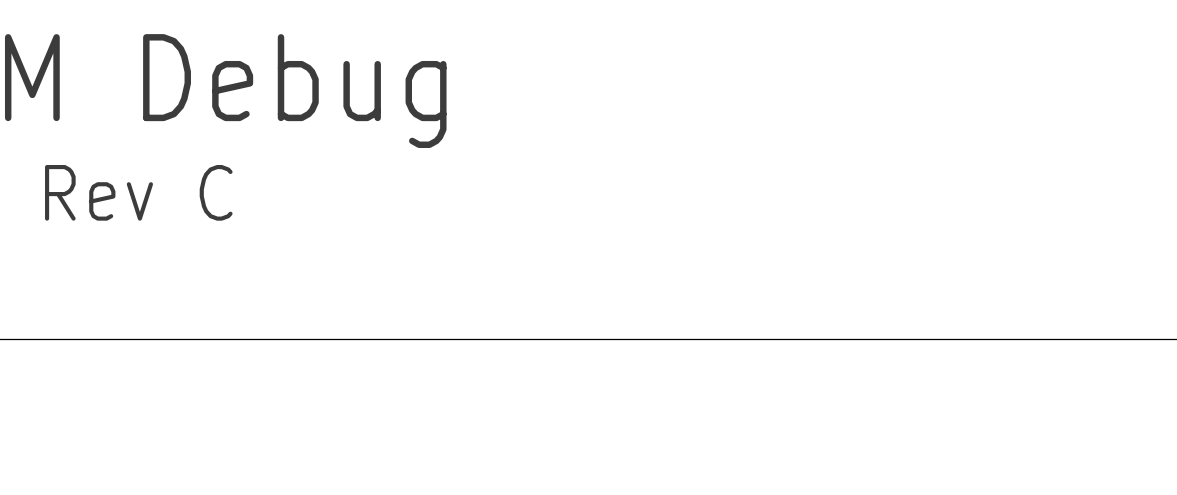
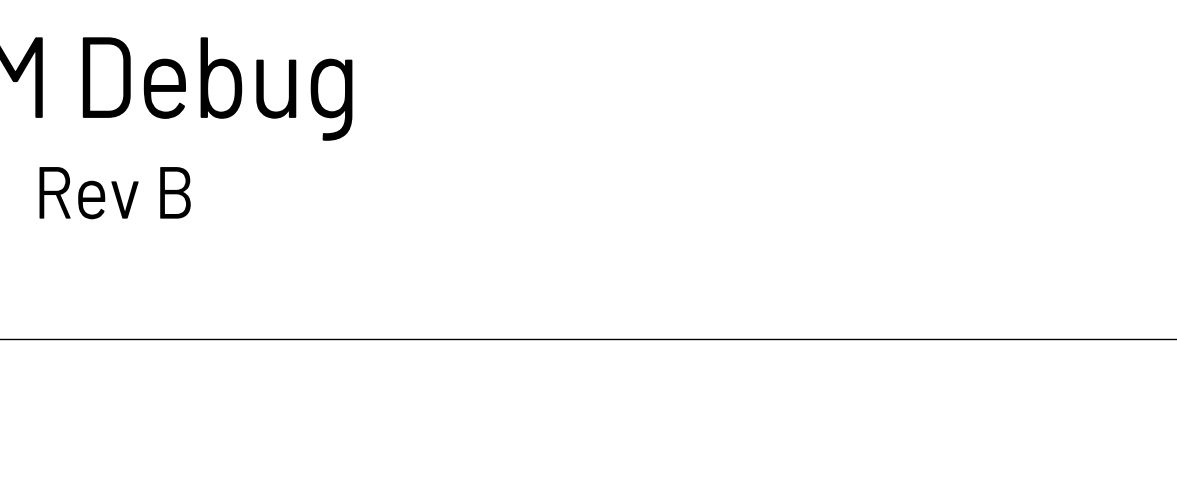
text: Rev C (138, 192) -> Rev B (115, 193)

